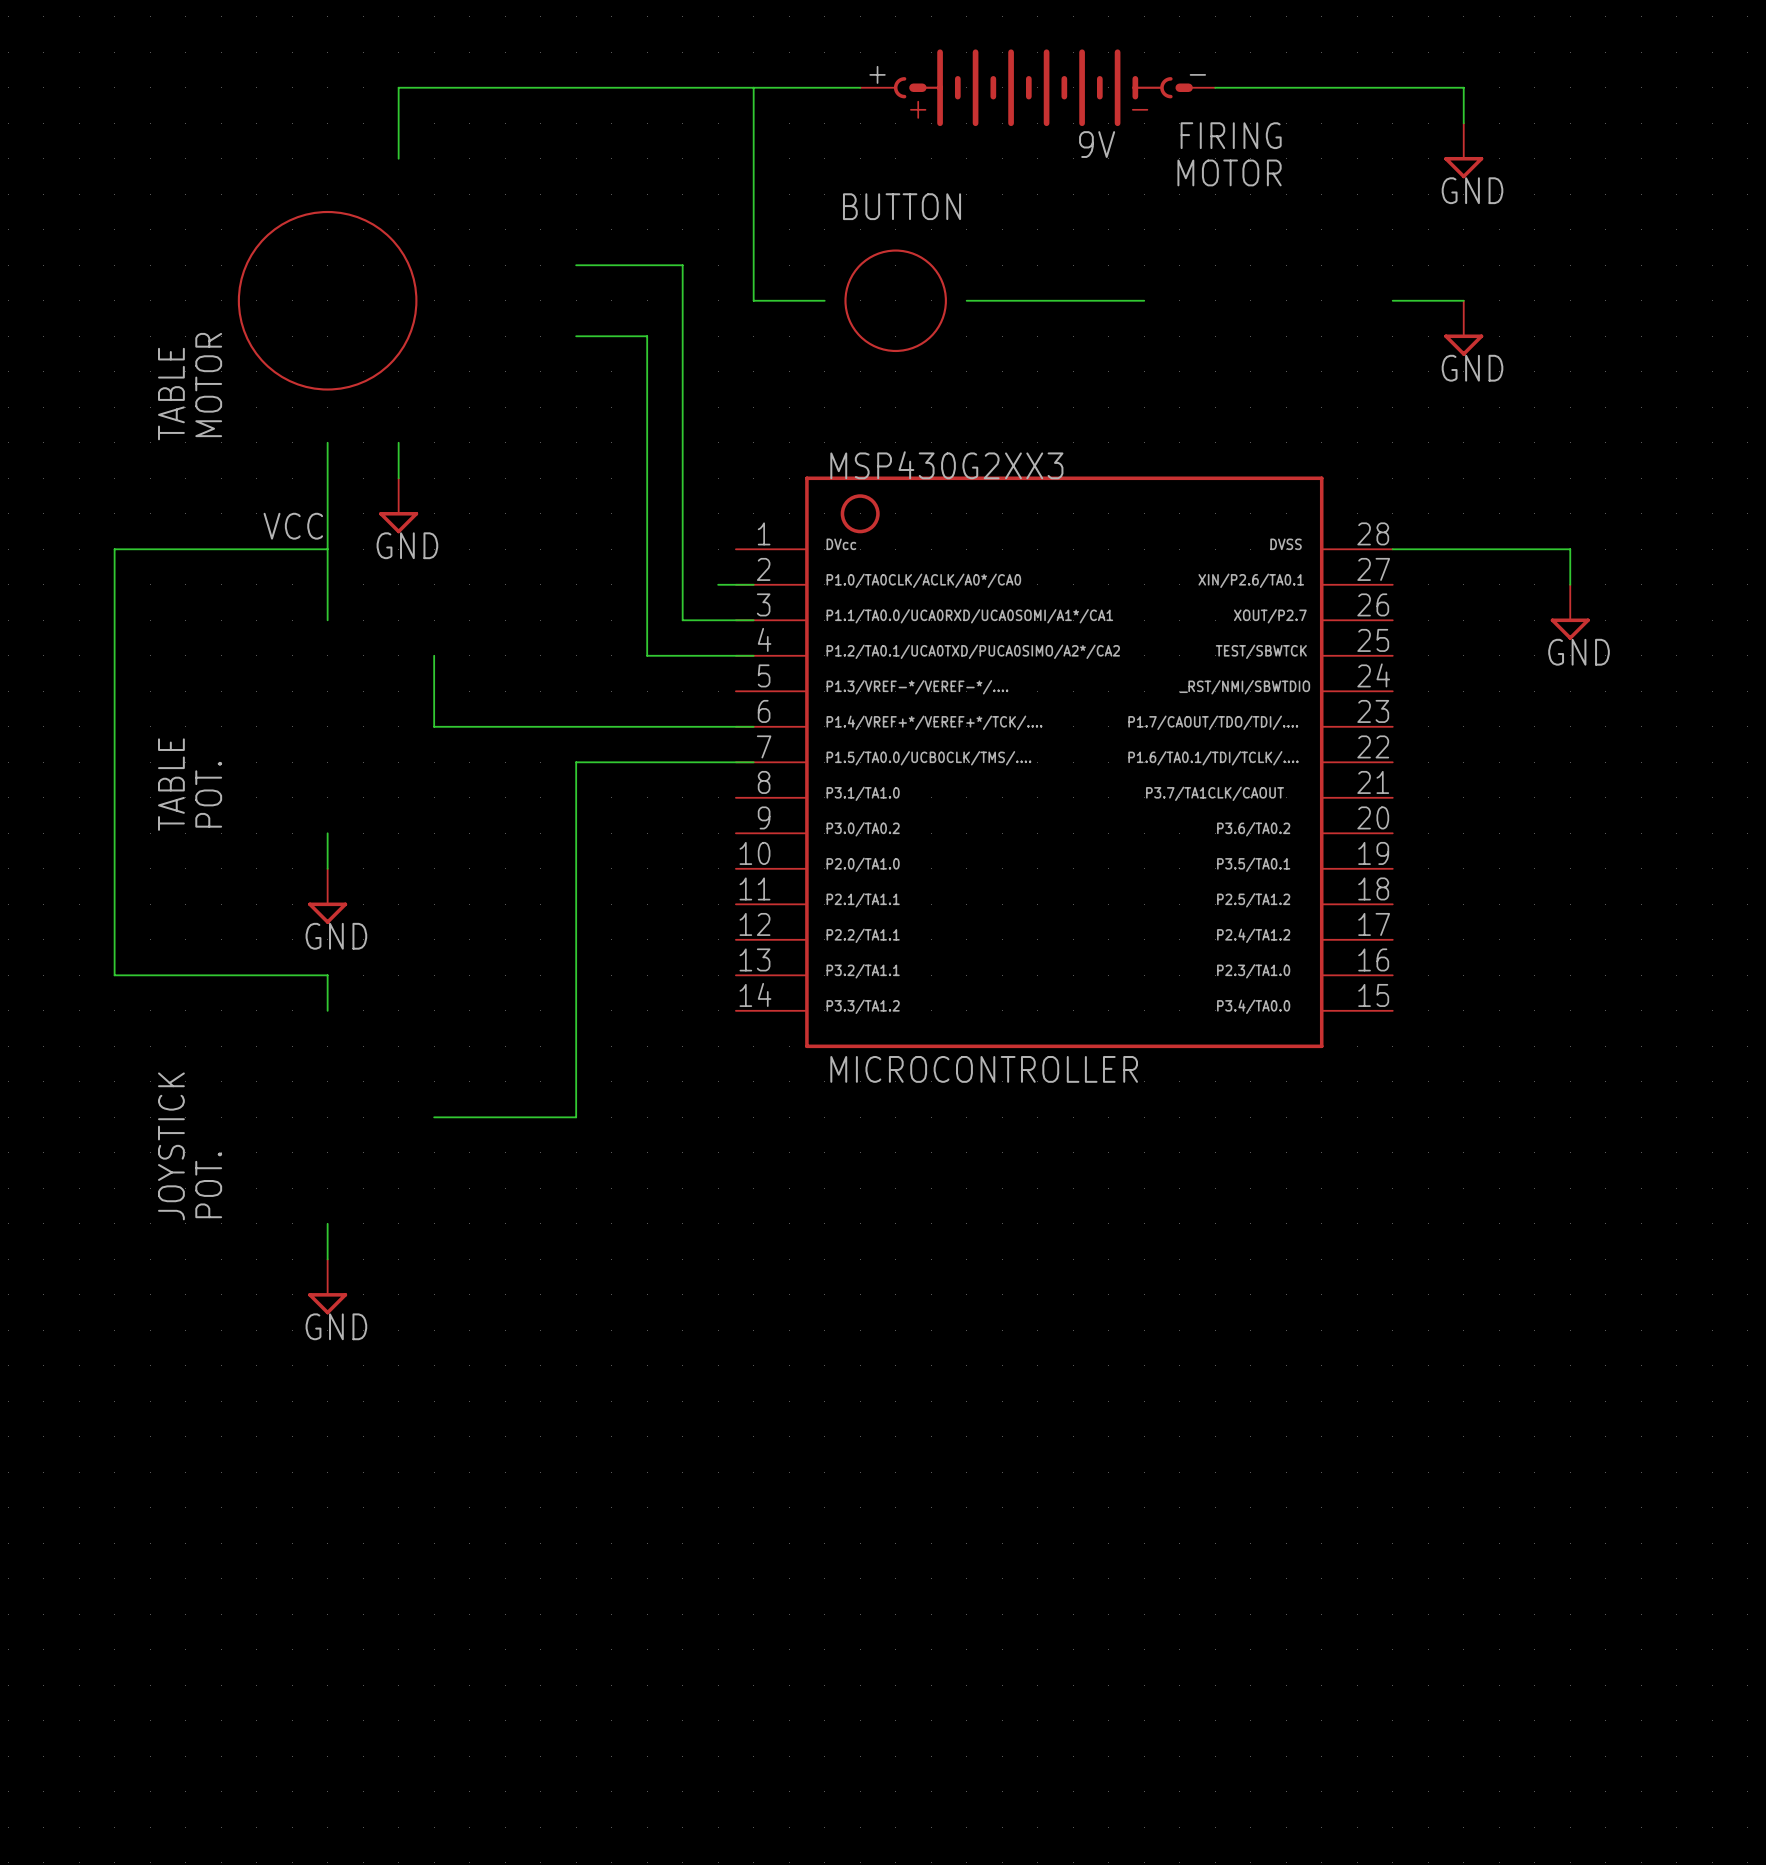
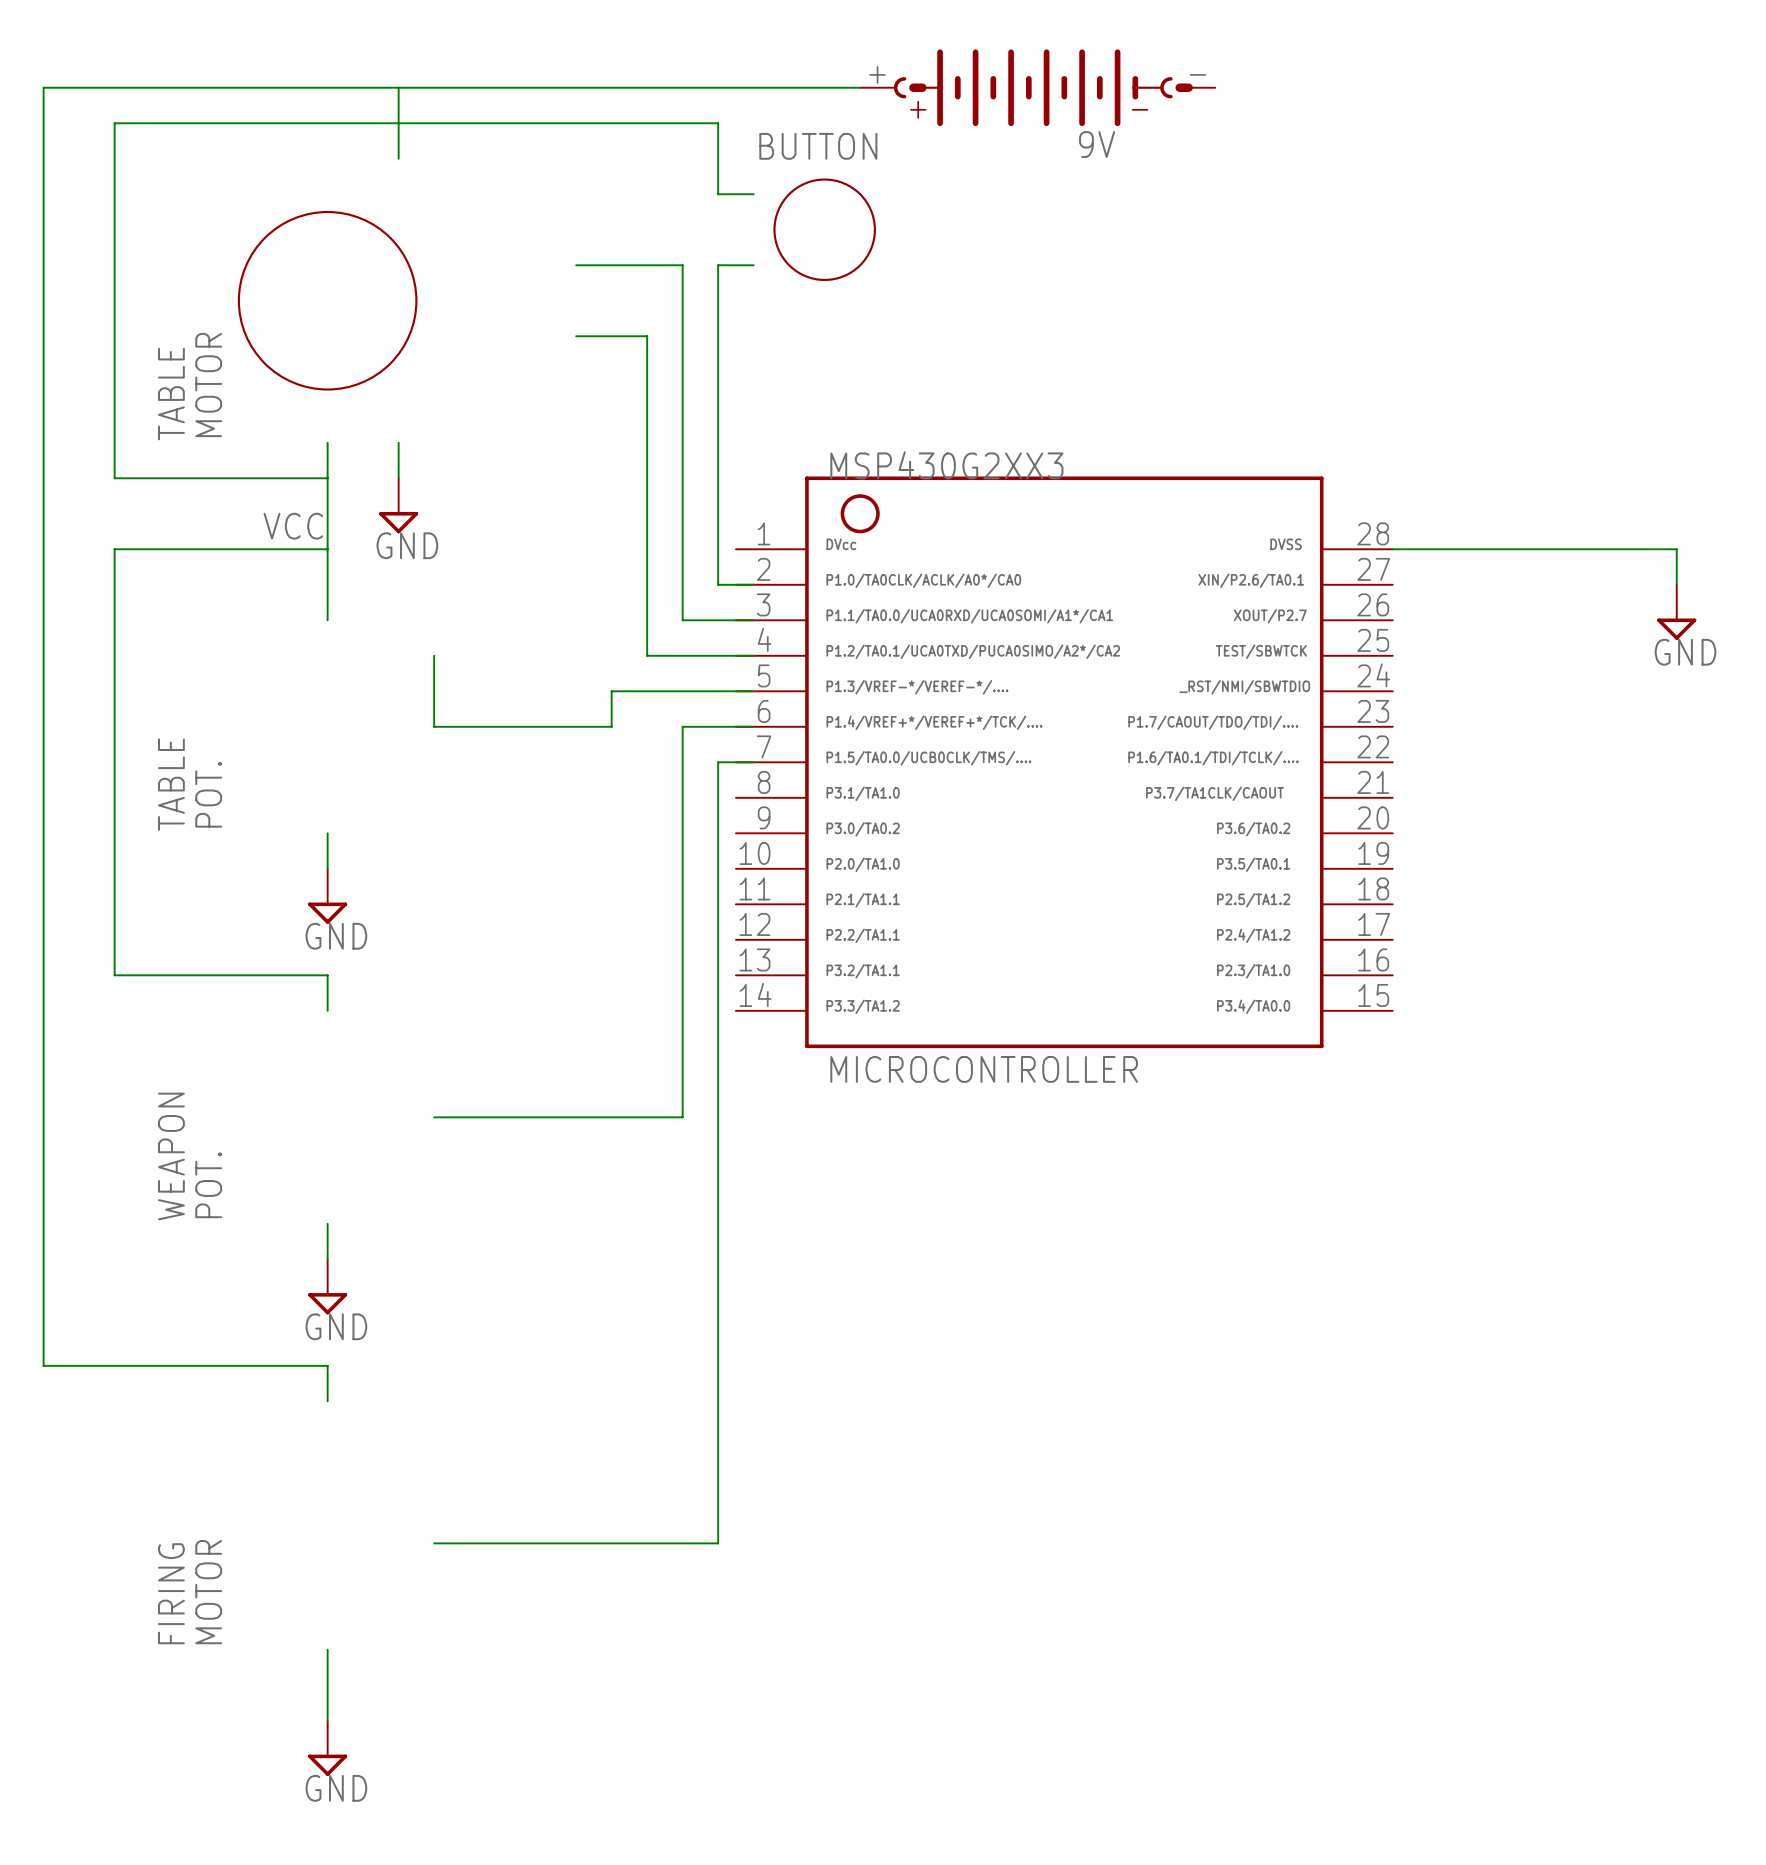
wire: none -> (398, 87) (43, 87) (43, 1365) (327, 1365) (327, 1401)
wire: (753, 87) (753, 300) (824, 300) -> none
wire: (1215, 87) (1463, 87) (1463, 123) -> none
text: FIRING (1231, 135) -> none
power symbol: GND (1463, 150) -> none
text: MOTOR (1229, 172) -> none
wire: none -> (753, 194) (718, 194) (718, 123) (114, 123) (114, 478) (327, 478)
text position: BUTTON (902, 206) -> BUTTON (818, 146)
wire: none -> (753, 265) (718, 265) (718, 584)
drawing position: (895, 300) -> (824, 229)
wire: (966, 300) (1144, 300) -> none
wire: (1392, 300) (1463, 300) -> none
power symbol: GND (1463, 328) -> none
wire: (1570, 549) (1570, 584) -> (1570, 549) (1676, 549) (1676, 584)
power symbol position: GND (1570, 612) -> GND (1676, 612)
wire: (611, 726) (682, 726) -> (611, 726) (611, 691) (753, 691)
wire: (718, 762) (576, 762) (576, 1117) -> (682, 726) (682, 1117) (576, 1117)
wire: none -> (718, 762) (718, 1543) (434, 1543)
text: JOYSTICK (171, 1146) -> WEAPON (171, 1156)
text: none -> MOTOR (208, 1592)
text: none -> FIRING (171, 1593)
wire: none -> (327, 1649) (327, 1720)
power symbol: none -> GND (327, 1748)

